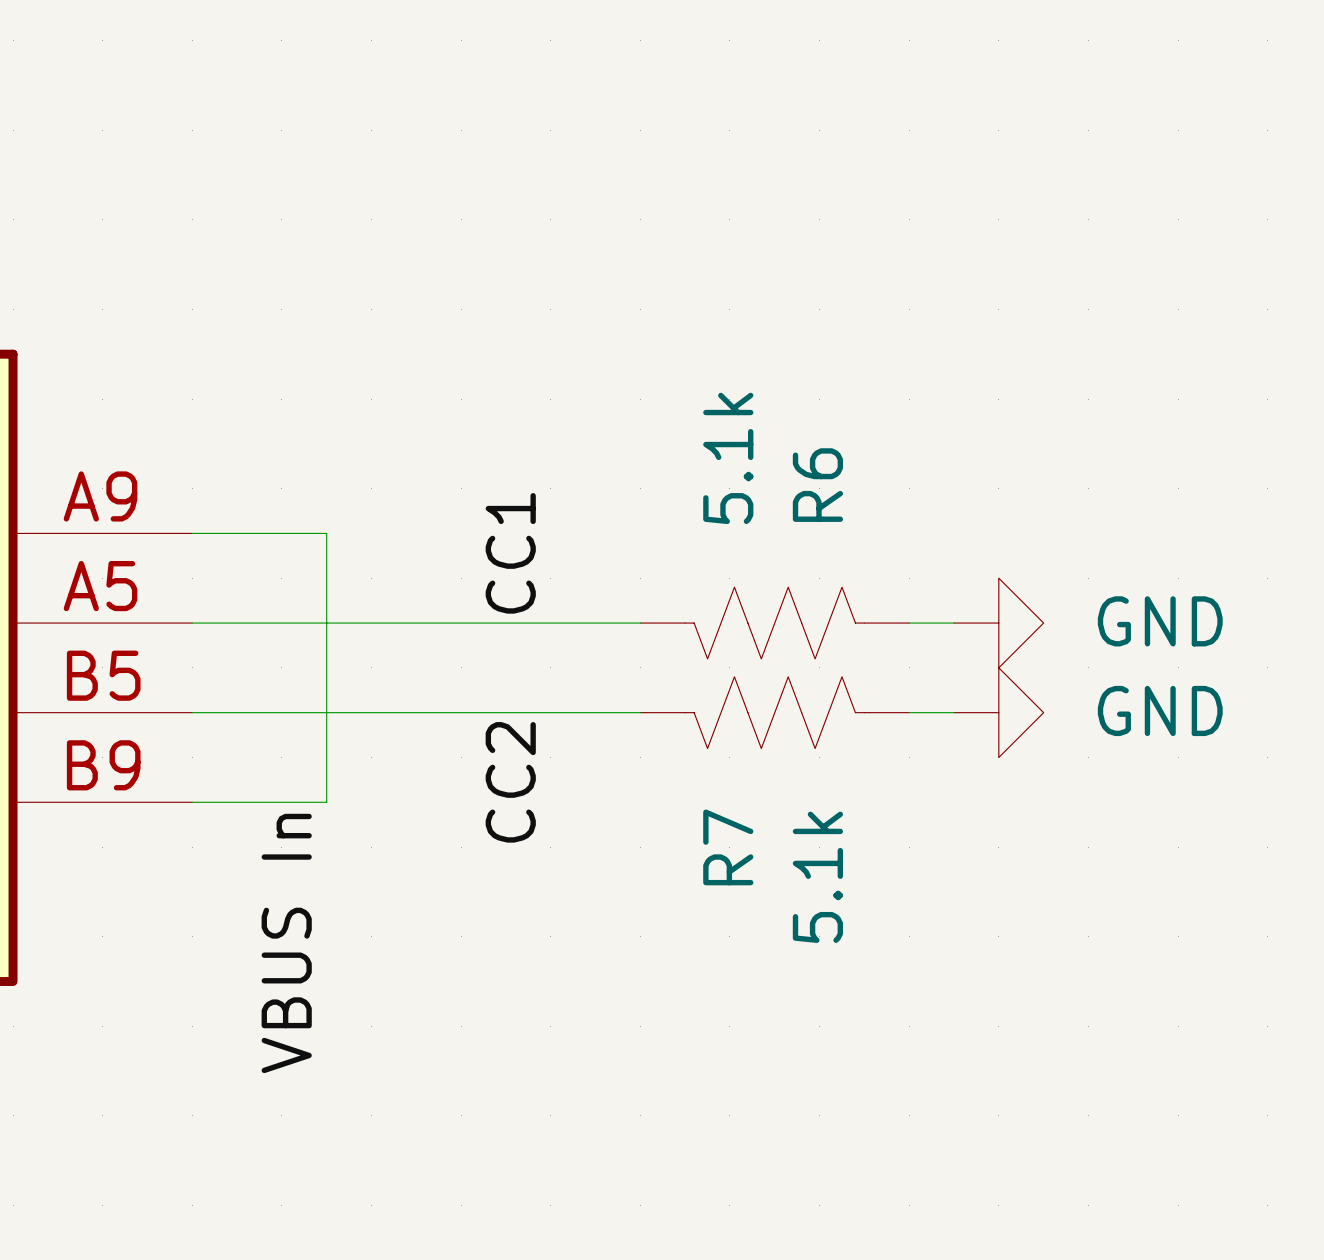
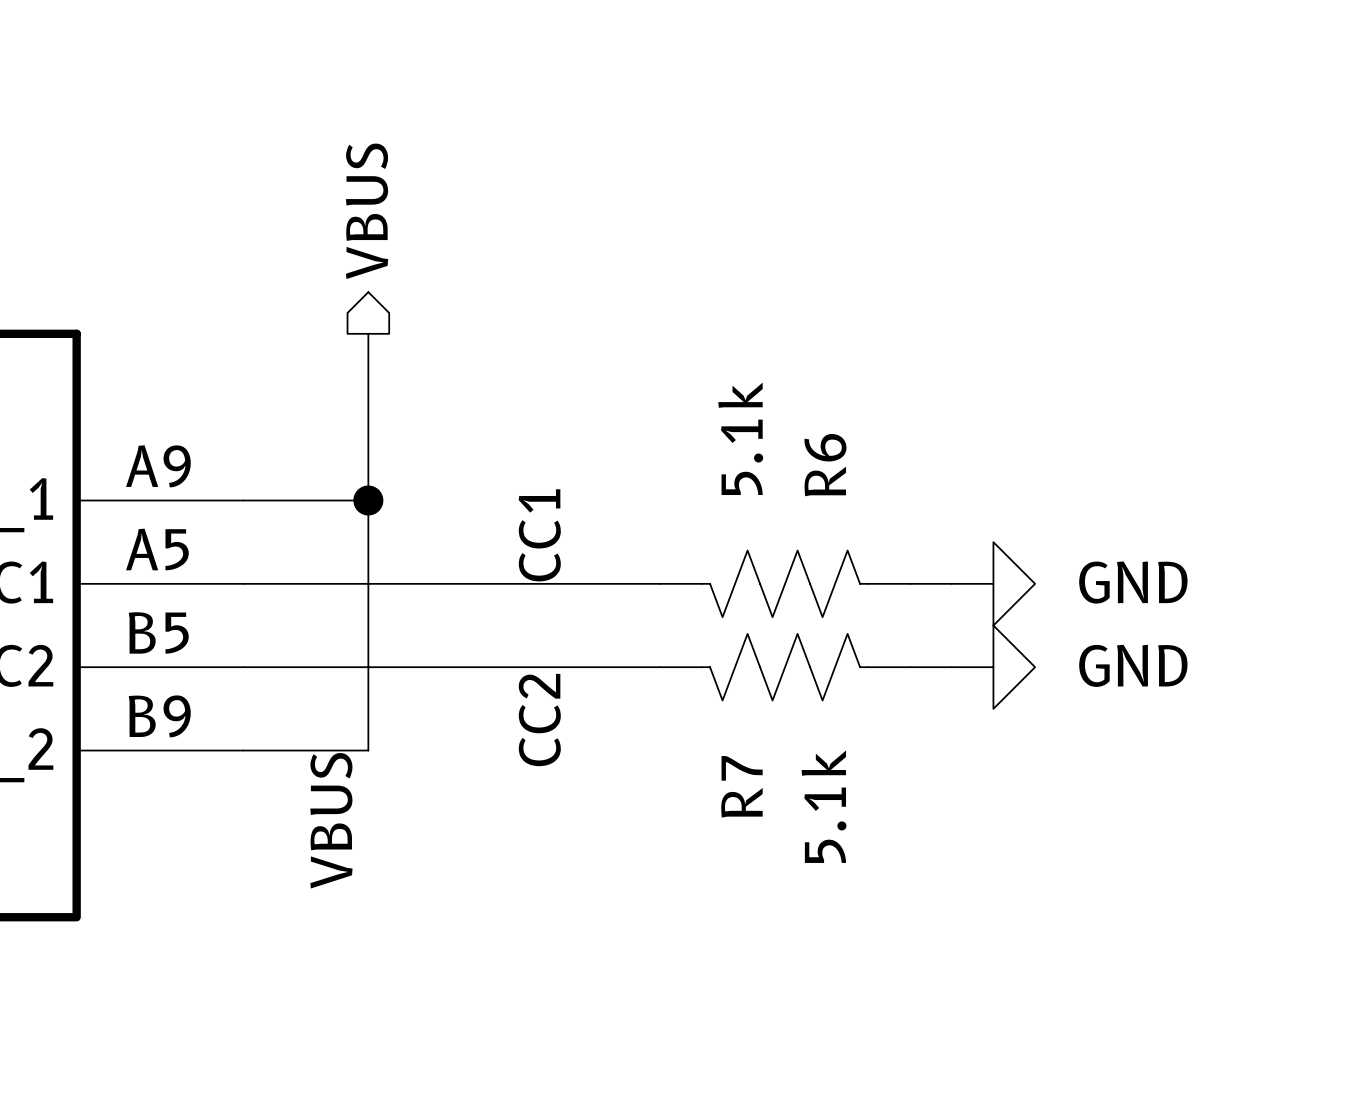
hierarchical label: none -> VBUS (367, 211)
wire: none -> (368, 333) (368, 500)
junction: none -> (368, 500)
label: VBUS In (286, 943) -> VBUS (331, 820)

